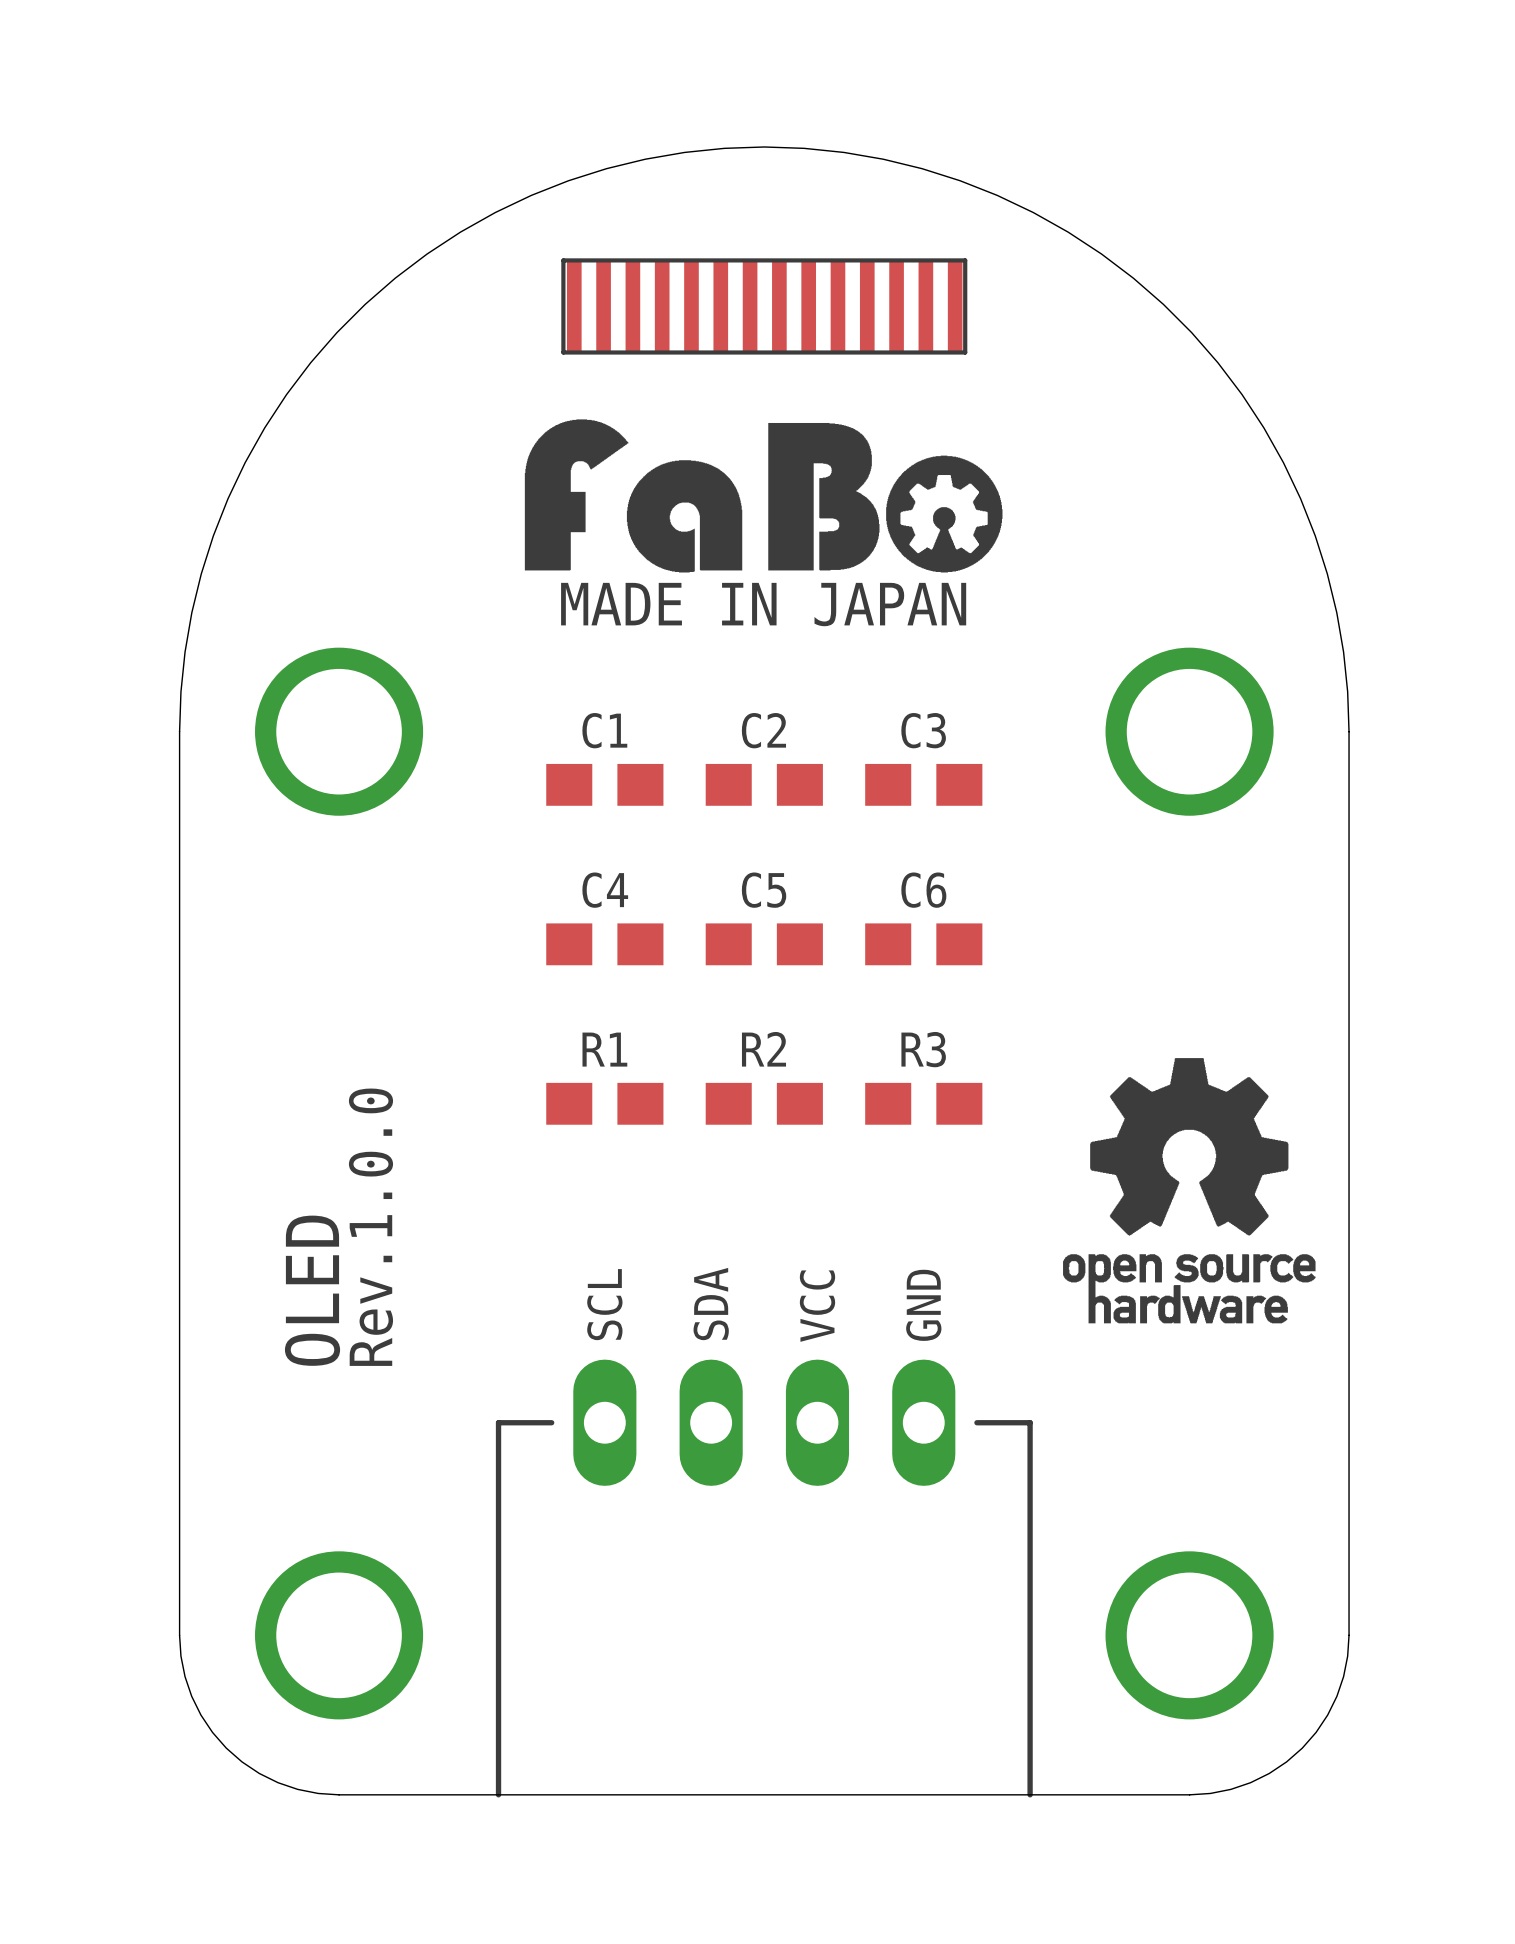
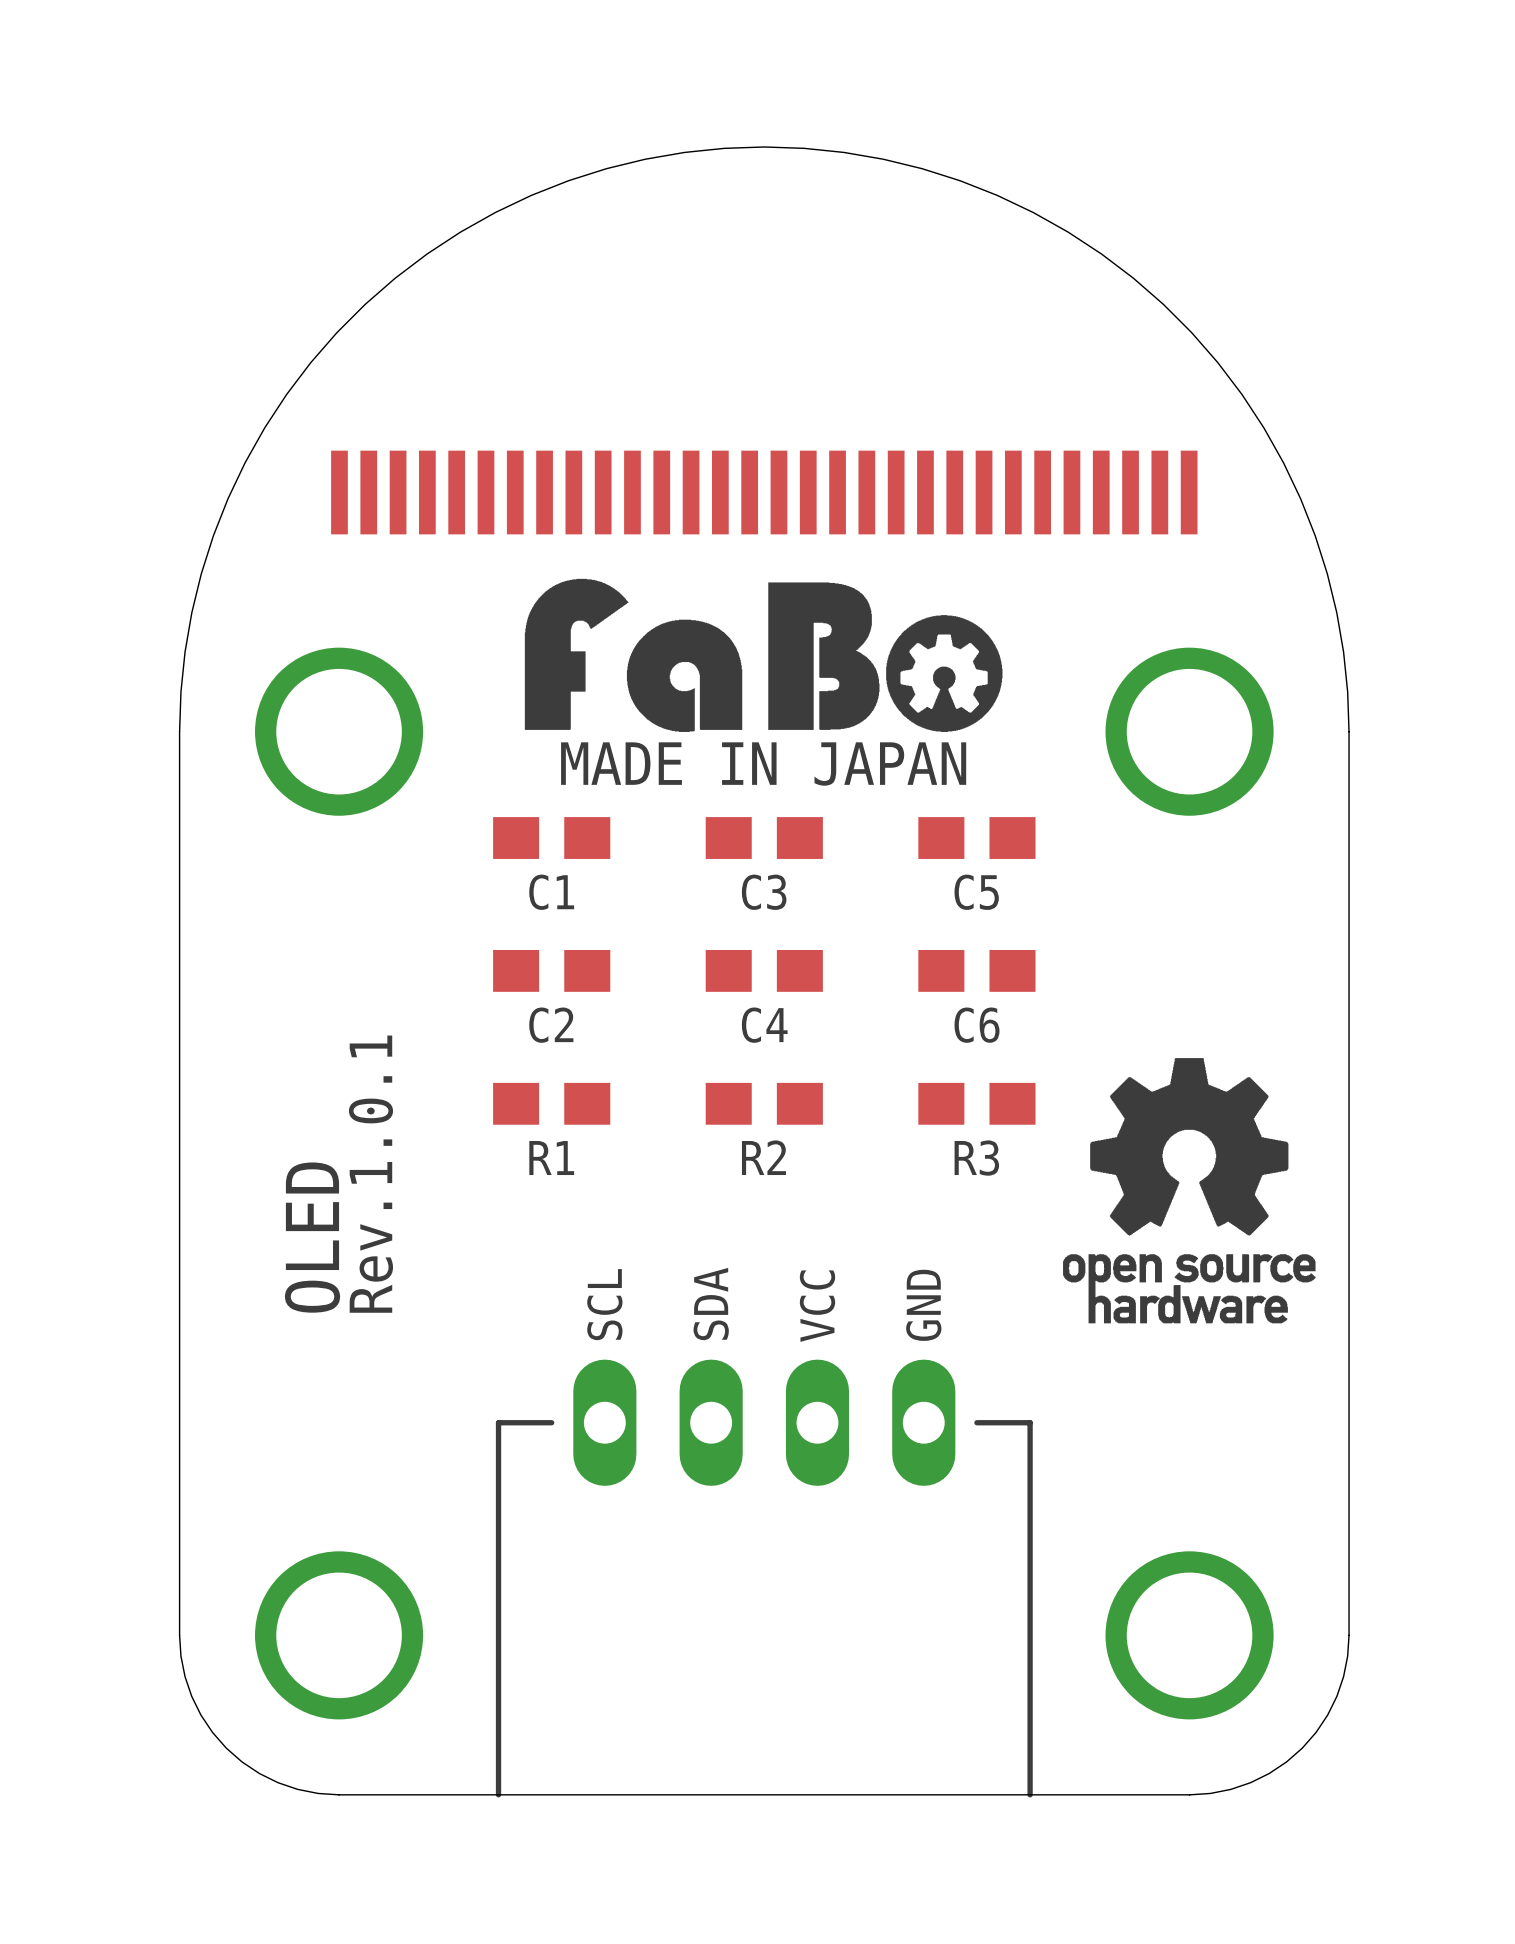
part: (764, 306) -> none
part: none -> (764, 492)
drawing position: (763, 495) -> (763, 655)
text position: MADE IN JAPAN (763, 604) -> MADE IN JAPAN (763, 764)
C1 name position: C1 (604, 730) -> C1 (551, 892)
C2 name position: C2 (763, 730) -> C2 (551, 1025)
C3 name position: C3 (923, 730) -> C3 (764, 892)
C1 position: (604, 784) -> (551, 838)
C2 position: (764, 784) -> (551, 970)
C3 position: (923, 784) -> (764, 838)
C4 name position: C4 (605, 890) -> C4 (764, 1025)
C5 name position: C5 (764, 890) -> C5 (976, 892)
C6 name position: C6 (923, 890) -> C6 (976, 1025)
C4 position: (604, 944) -> (764, 970)
C5 position: (764, 944) -> (976, 838)
C6 position: (923, 944) -> (976, 970)
R1 name position: R1 (604, 1049) -> R1 (551, 1158)
R2 name position: R2 (763, 1049) -> R2 (763, 1157)
R3 name position: R3 (923, 1049) -> R3 (976, 1158)
R1 position: (604, 1103) -> (551, 1103)
R3 position: (923, 1103) -> (976, 1103)
text: Rev.1.0.0 (370, 1227) -> Rev.1.0.1 (370, 1174)
text position: OLED (312, 1290) -> OLED (312, 1237)

